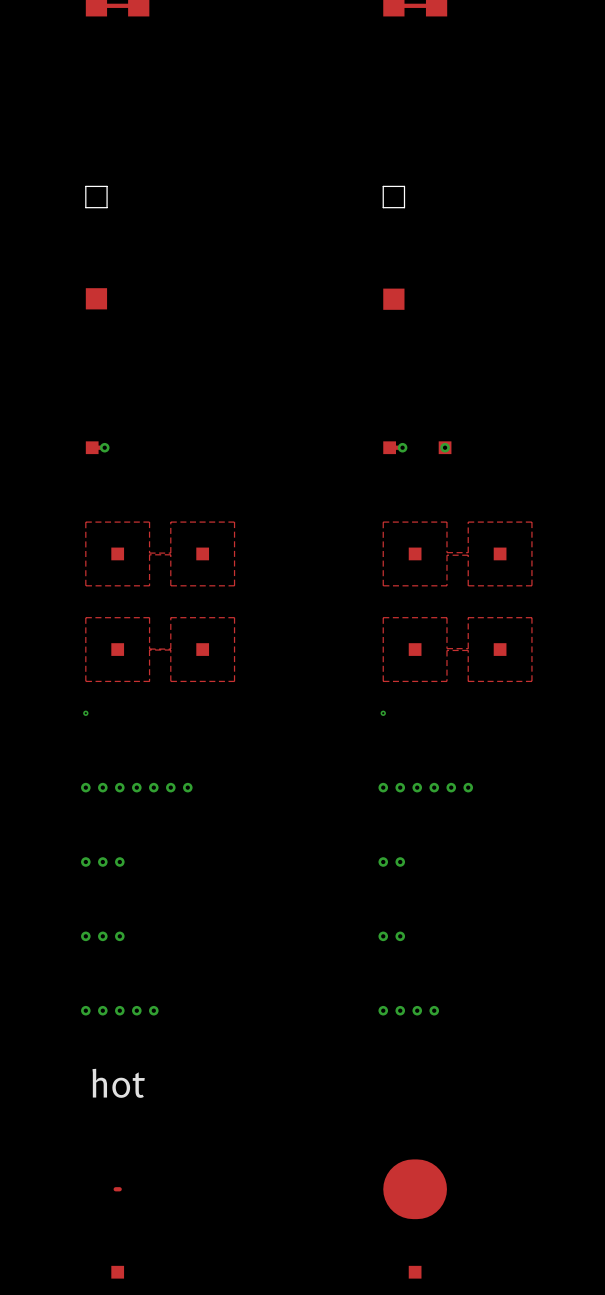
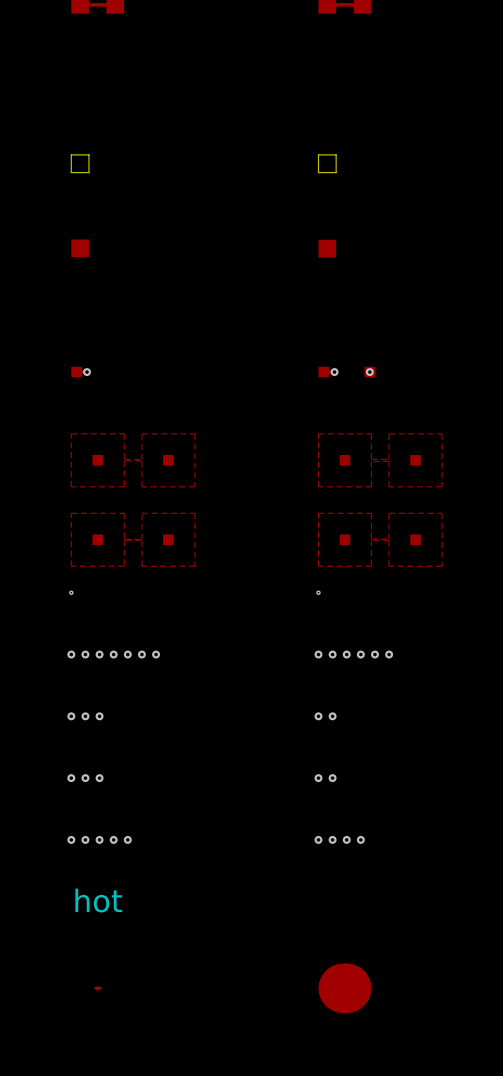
part: (117, 1272) -> none
part: (415, 1272) -> none

